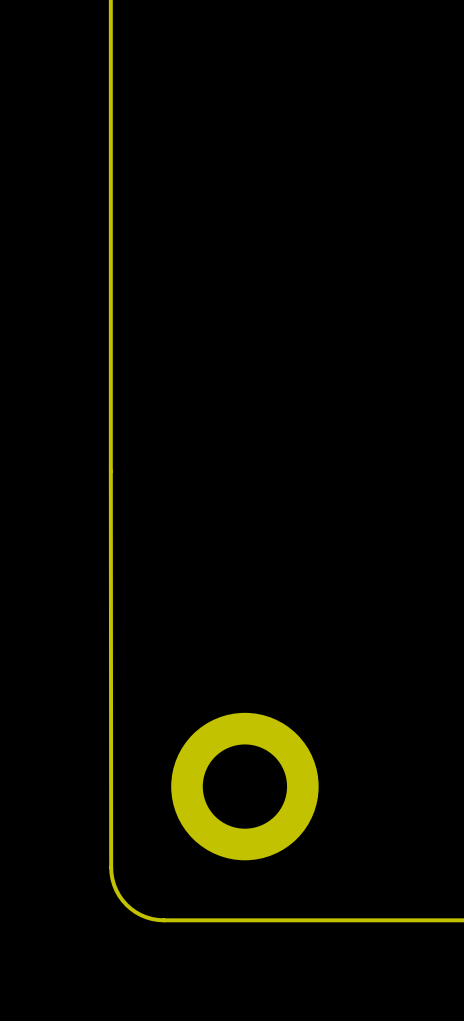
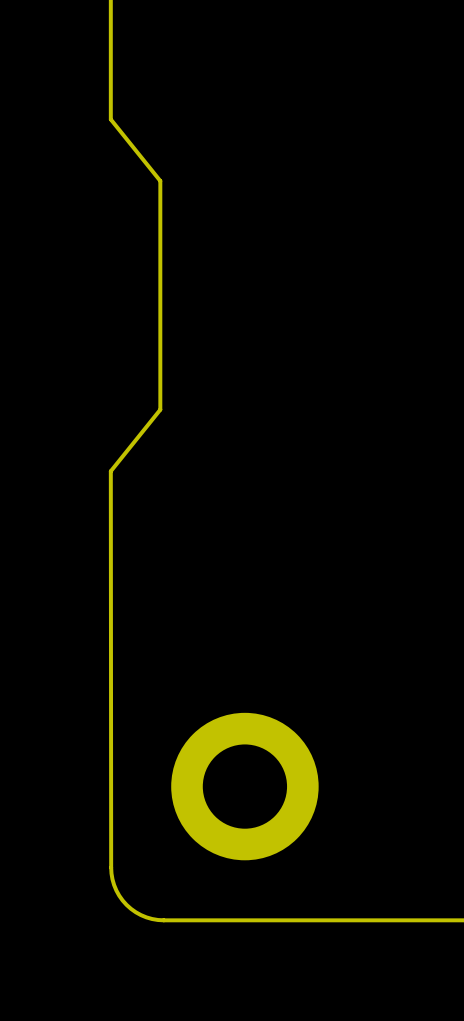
board edge: (110, 119) (110, 471) -> (110, 119) (160, 180) (160, 409) (110, 471)

